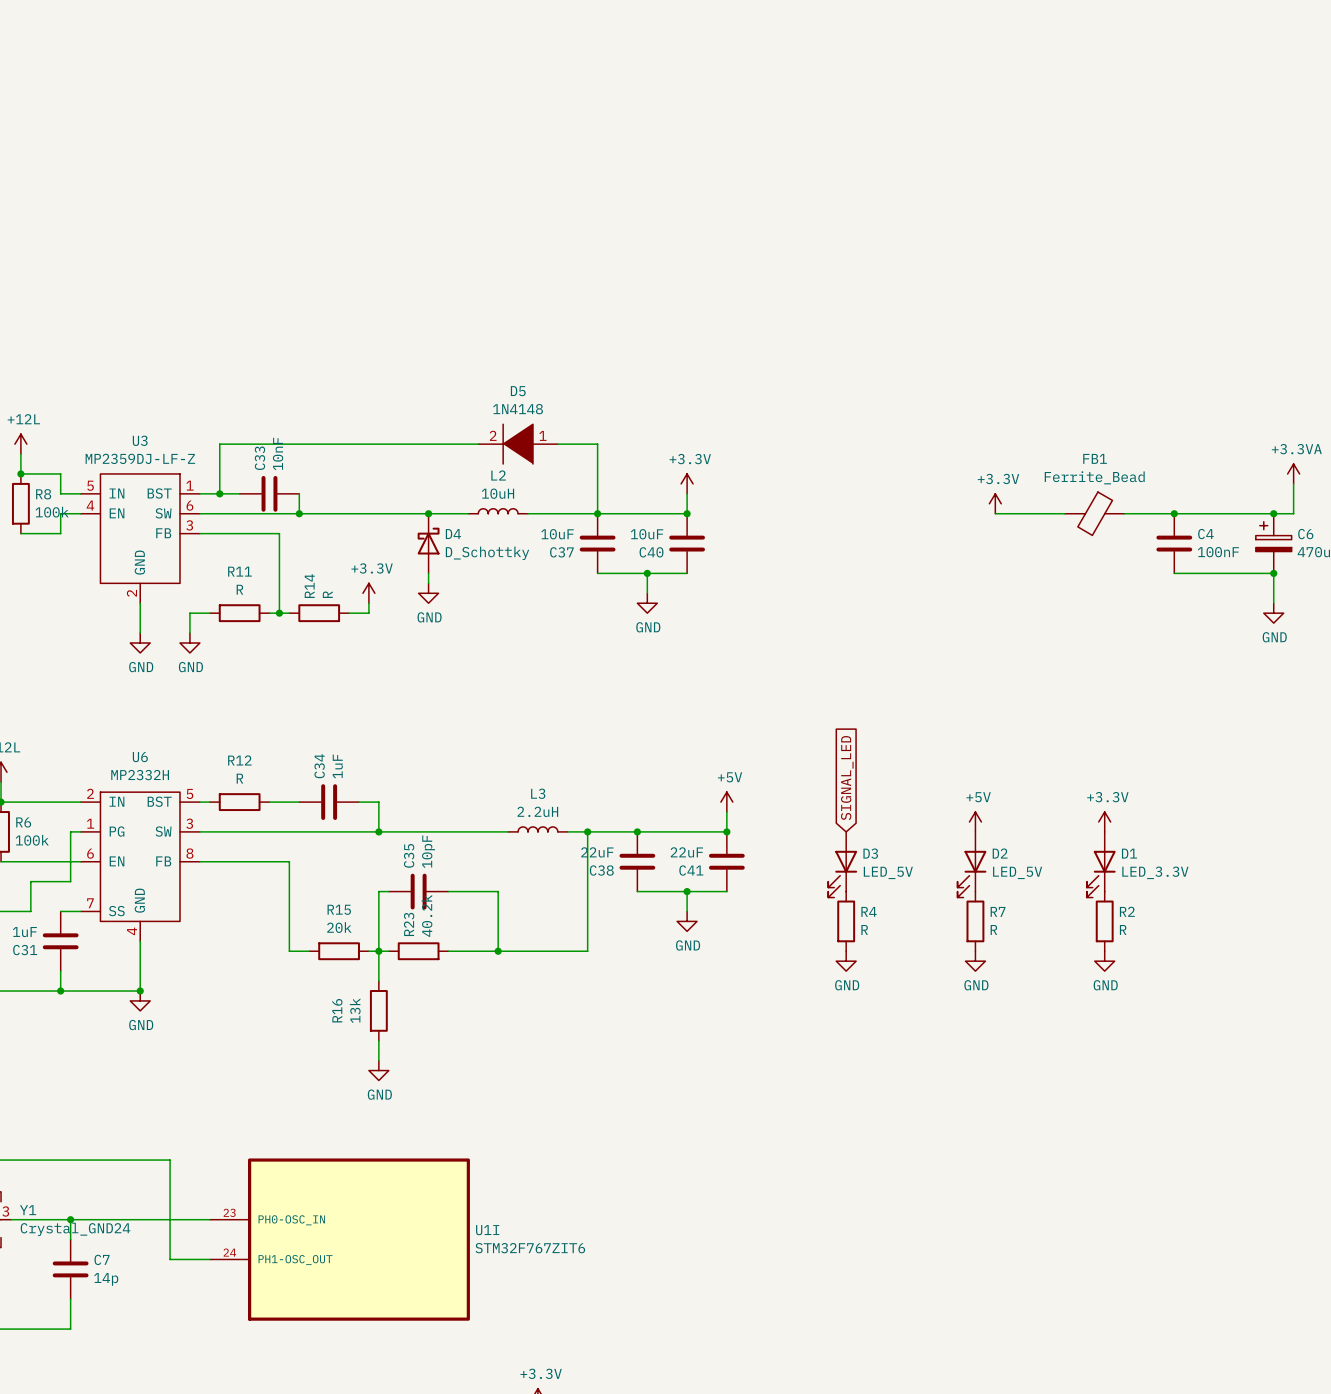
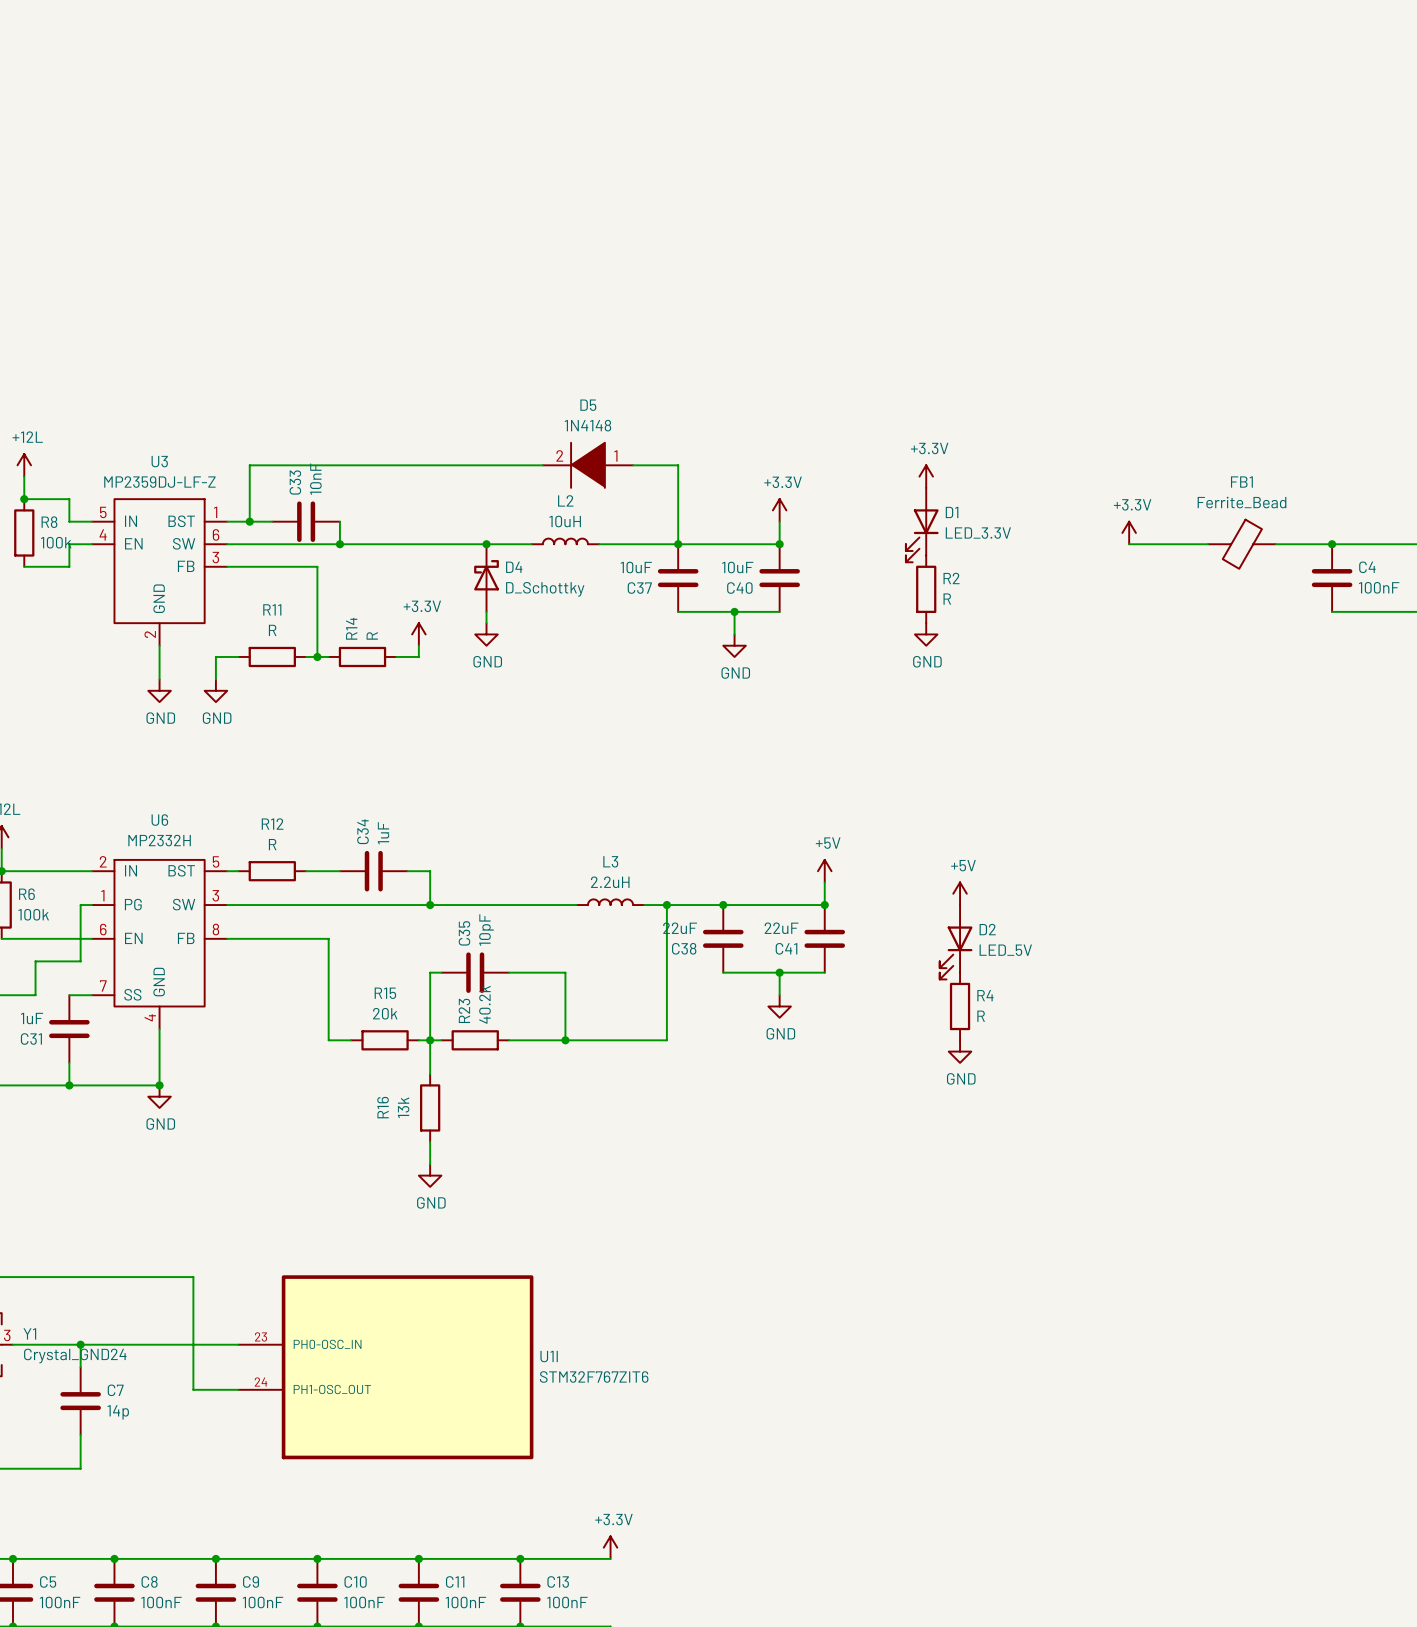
power symbol: none -> +3.3V (926, 476)
power symbol: none -> GND (926, 634)
global label: SIGNAL_LED (847, 778) -> none
power symbol position: +5V (975, 821) -> +5V (960, 893)
power symbol: +3.3V (1104, 821) -> none
D3 name: D3 (870, 853) -> D2 (987, 929)
D2: LED_5V (971, 864) -> none
D1 position: (1101, 864) -> (922, 525)
R7: R (975, 921) -> none
R2 position: (1104, 921) -> (926, 589)
power symbol: GND (975, 961) -> none
power symbol: GND (1104, 961) -> none

